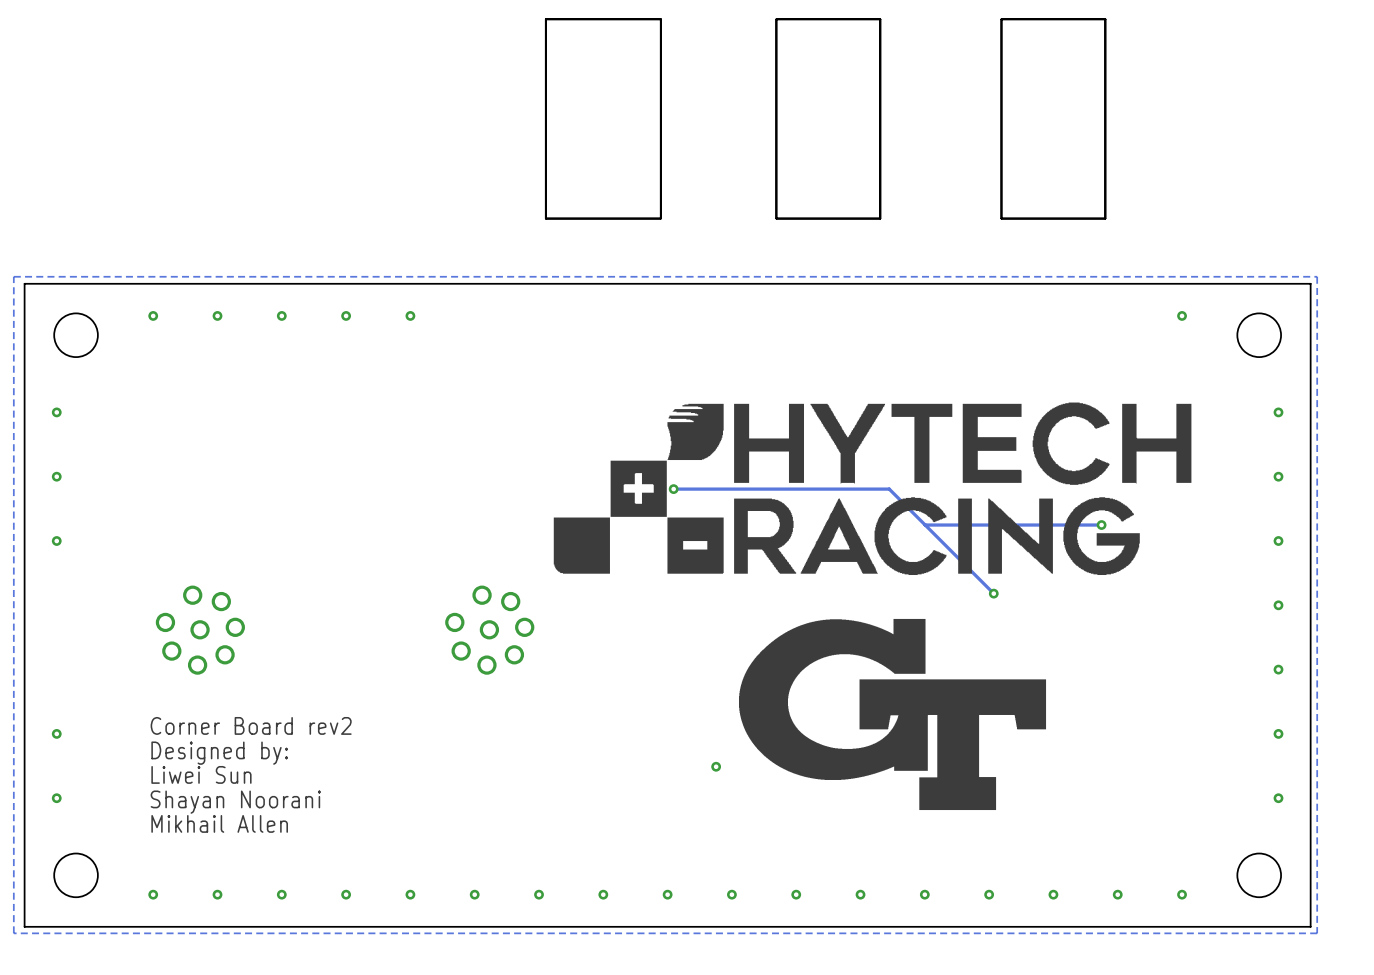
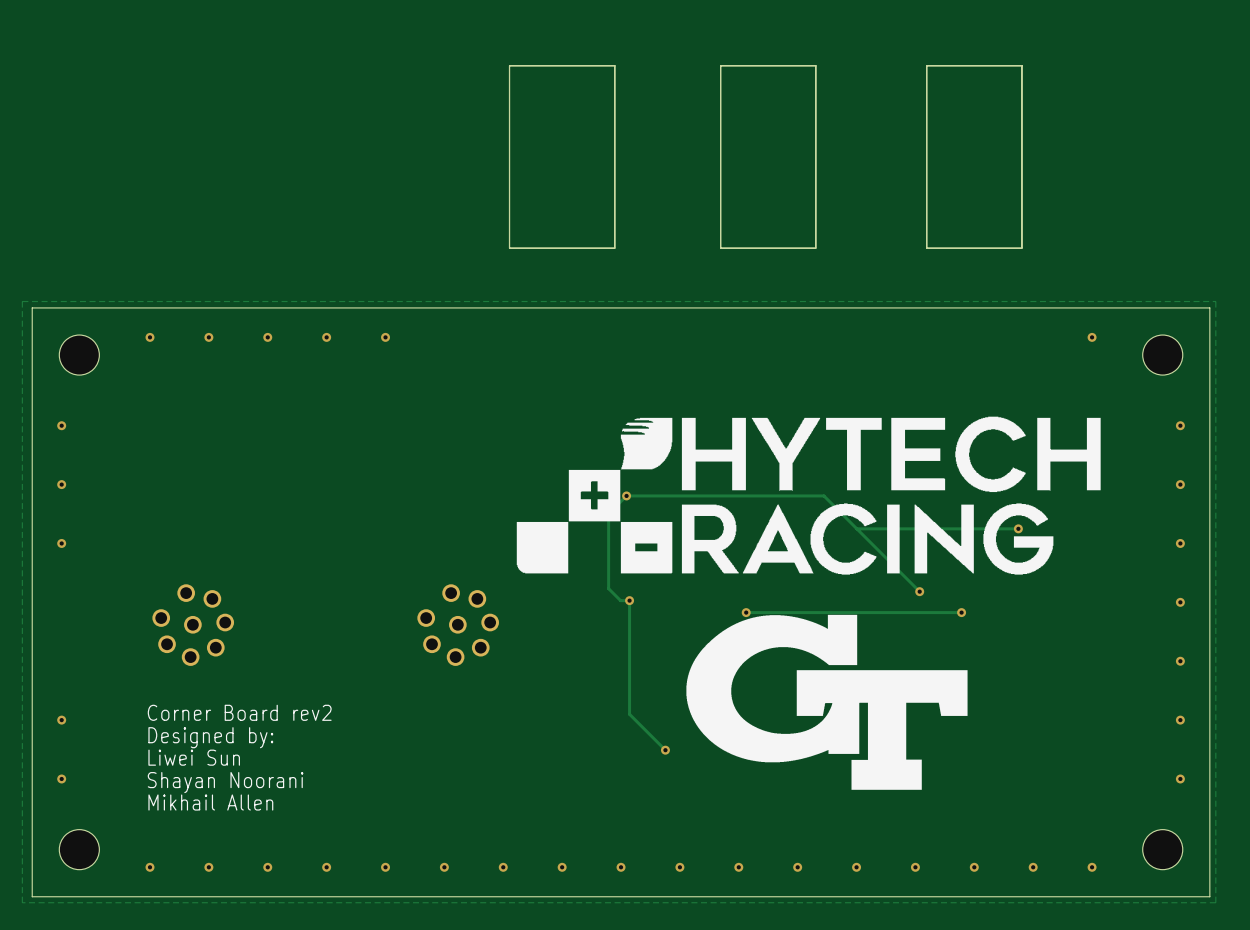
track: none -> (626, 495) (608, 513) (608, 588) (620, 600) (629, 600) (629, 714) (665, 750)
via: none -> (629, 600)
via: none -> (746, 612)
track: none -> (961, 612) (746, 612)
via: none -> (961, 612)

